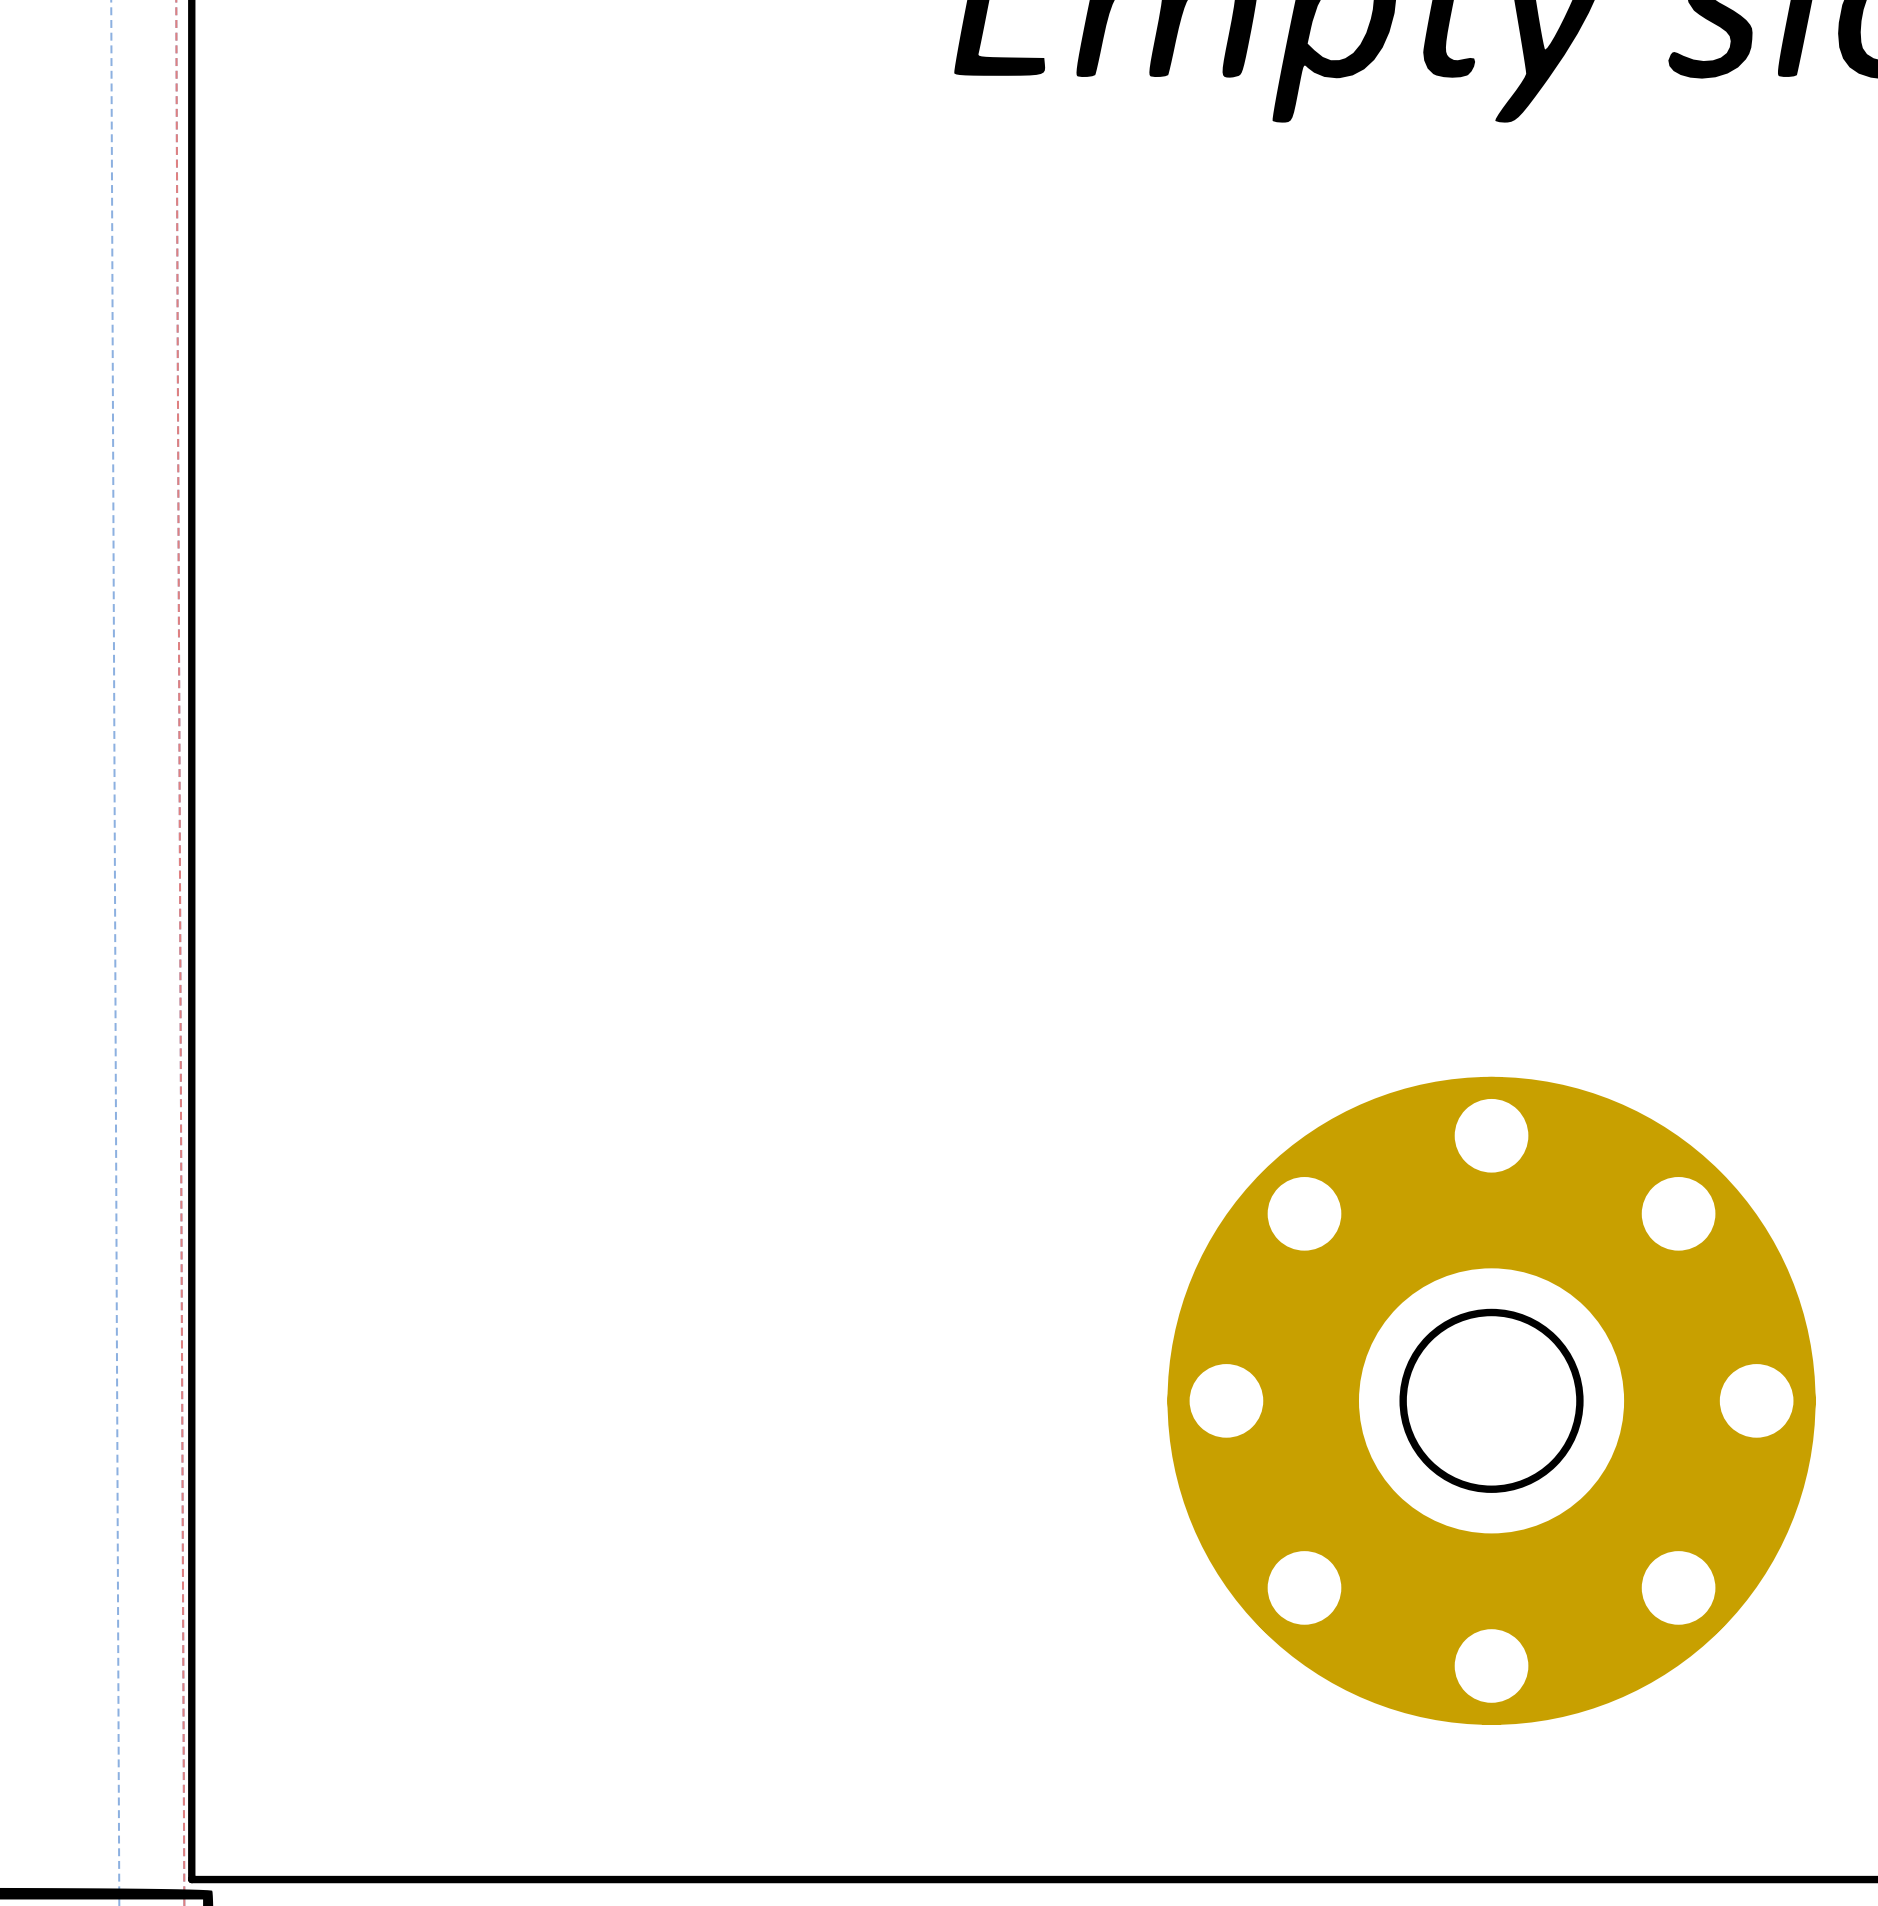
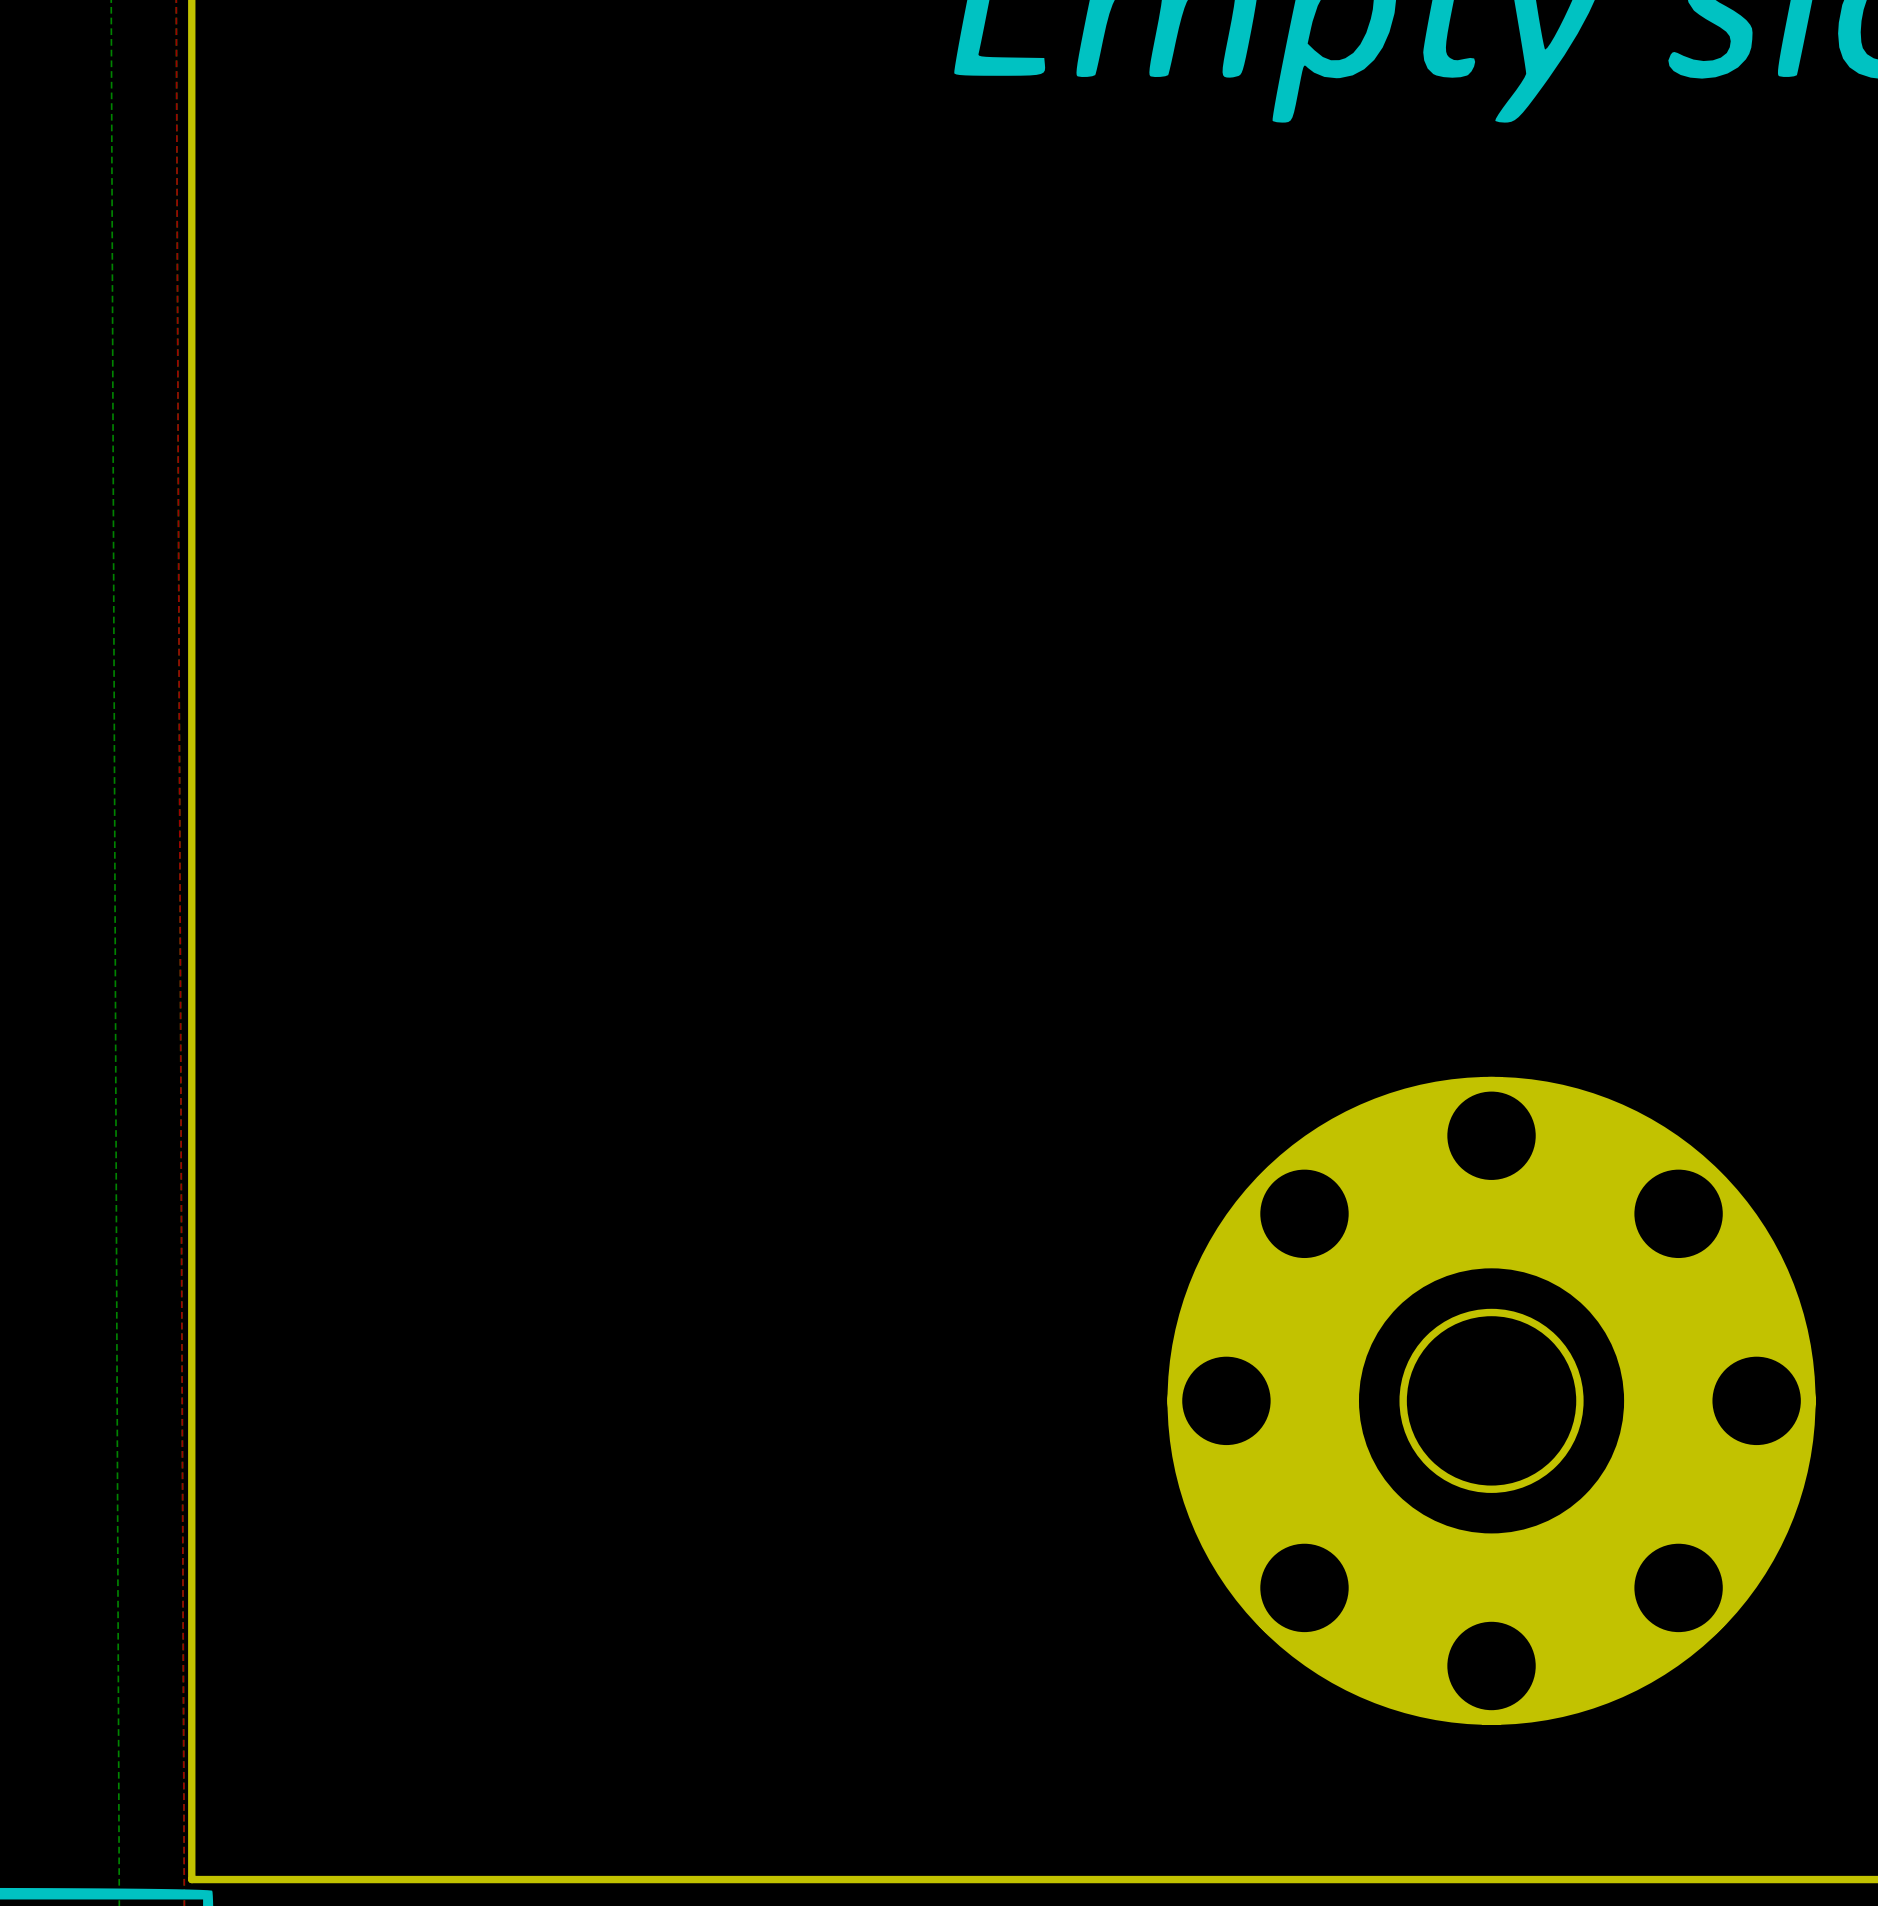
part footprint: [1167, 1076, 1816, 1725] -> [1167, 1076, 1816, 1725]

